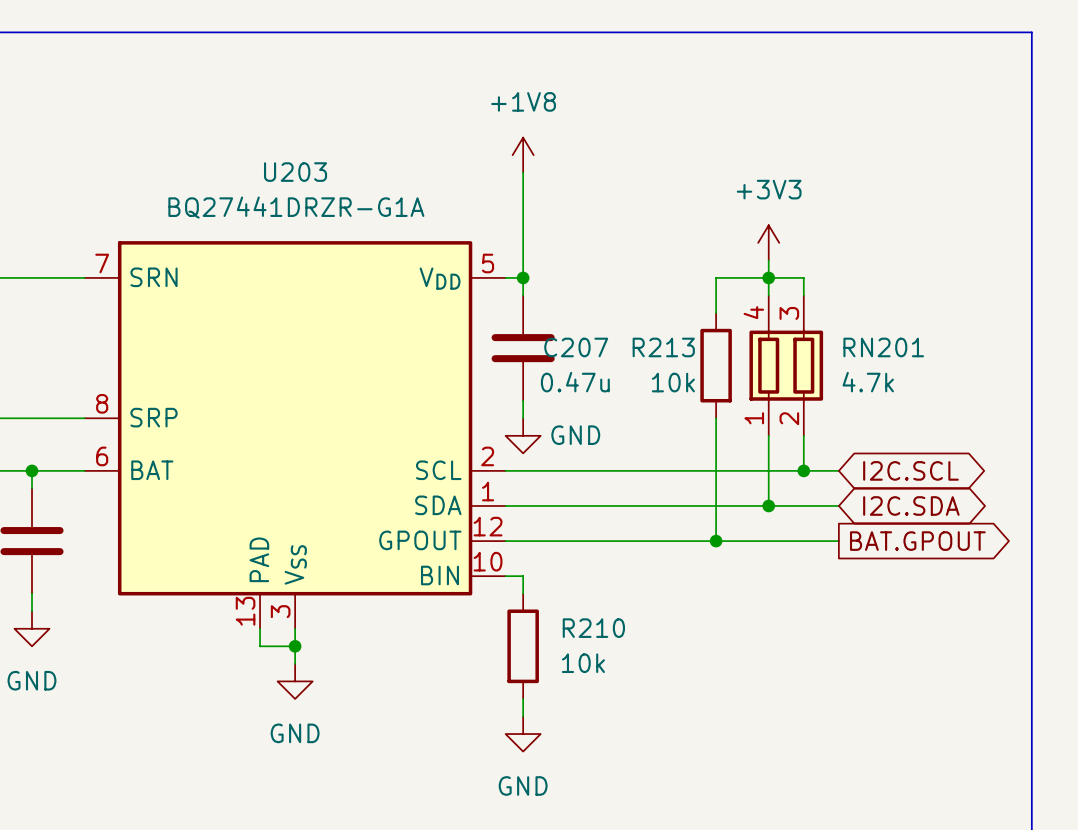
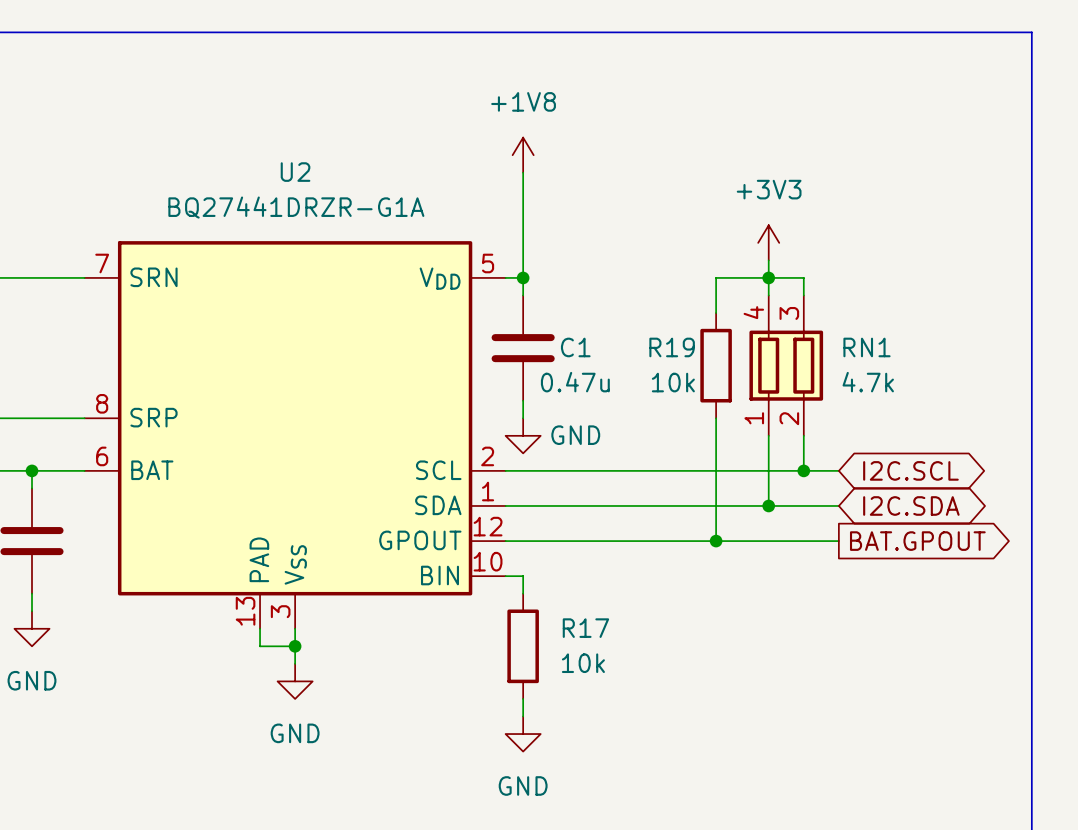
U203 name: U203 (295, 172) -> U2 (295, 172)
C207 name: C207 (576, 347) -> C1 (575, 347)
R213 name: R213 (663, 347) -> R19 (672, 347)
RN201 name: RN201 (883, 347) -> RN1 (866, 347)
R210 name: R210 (593, 628) -> R17 (585, 628)

